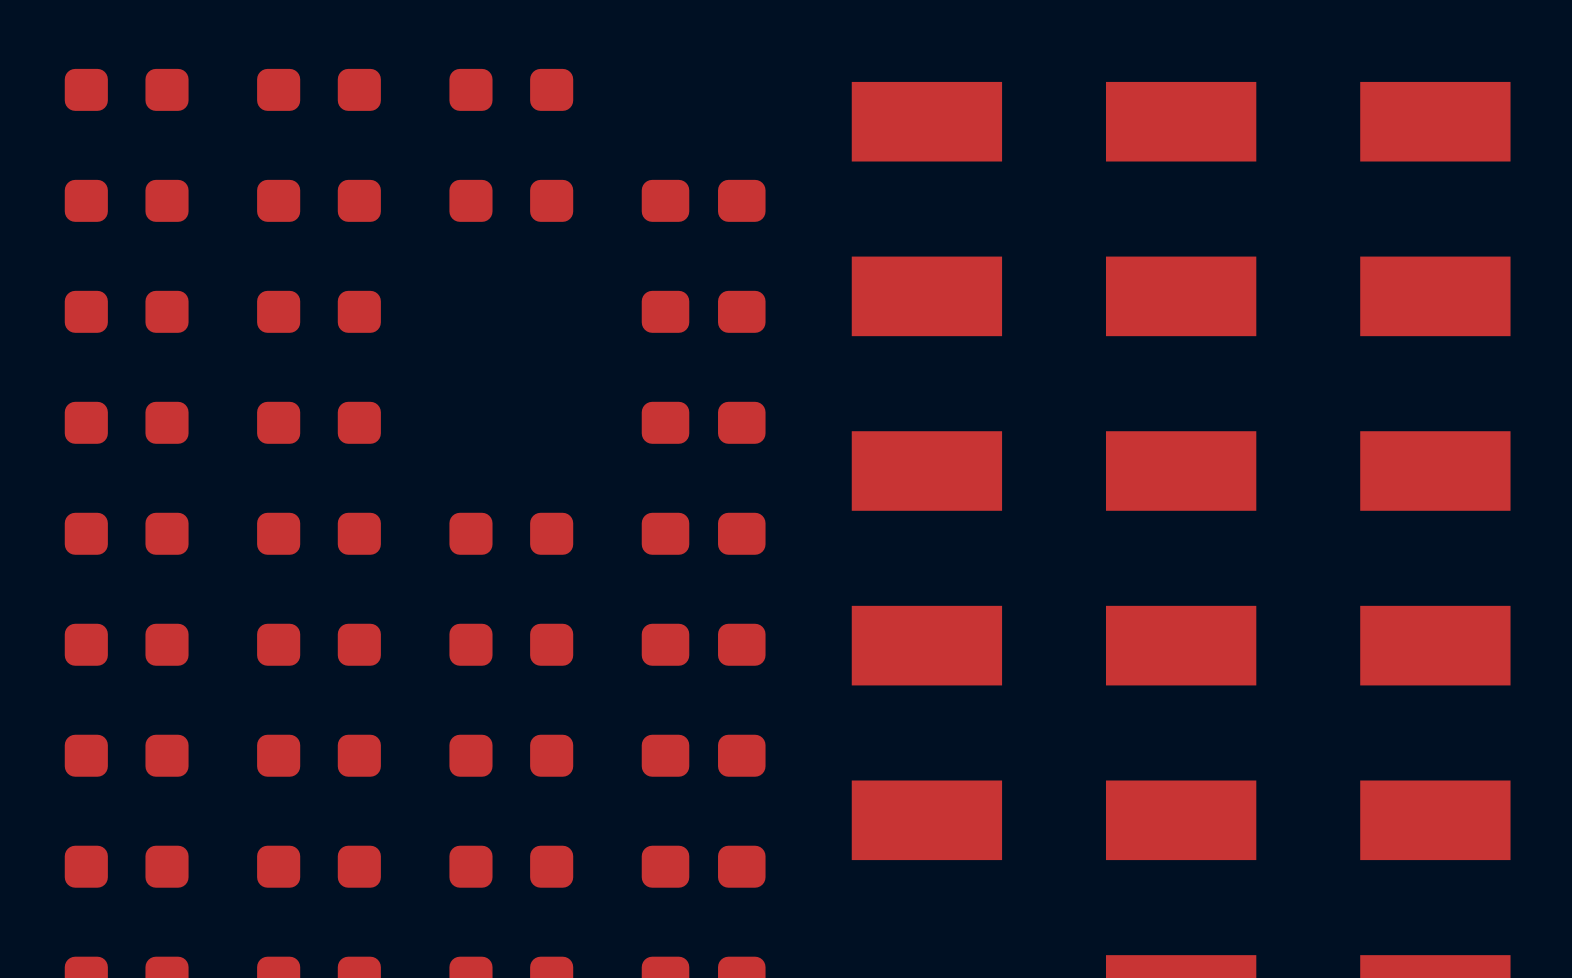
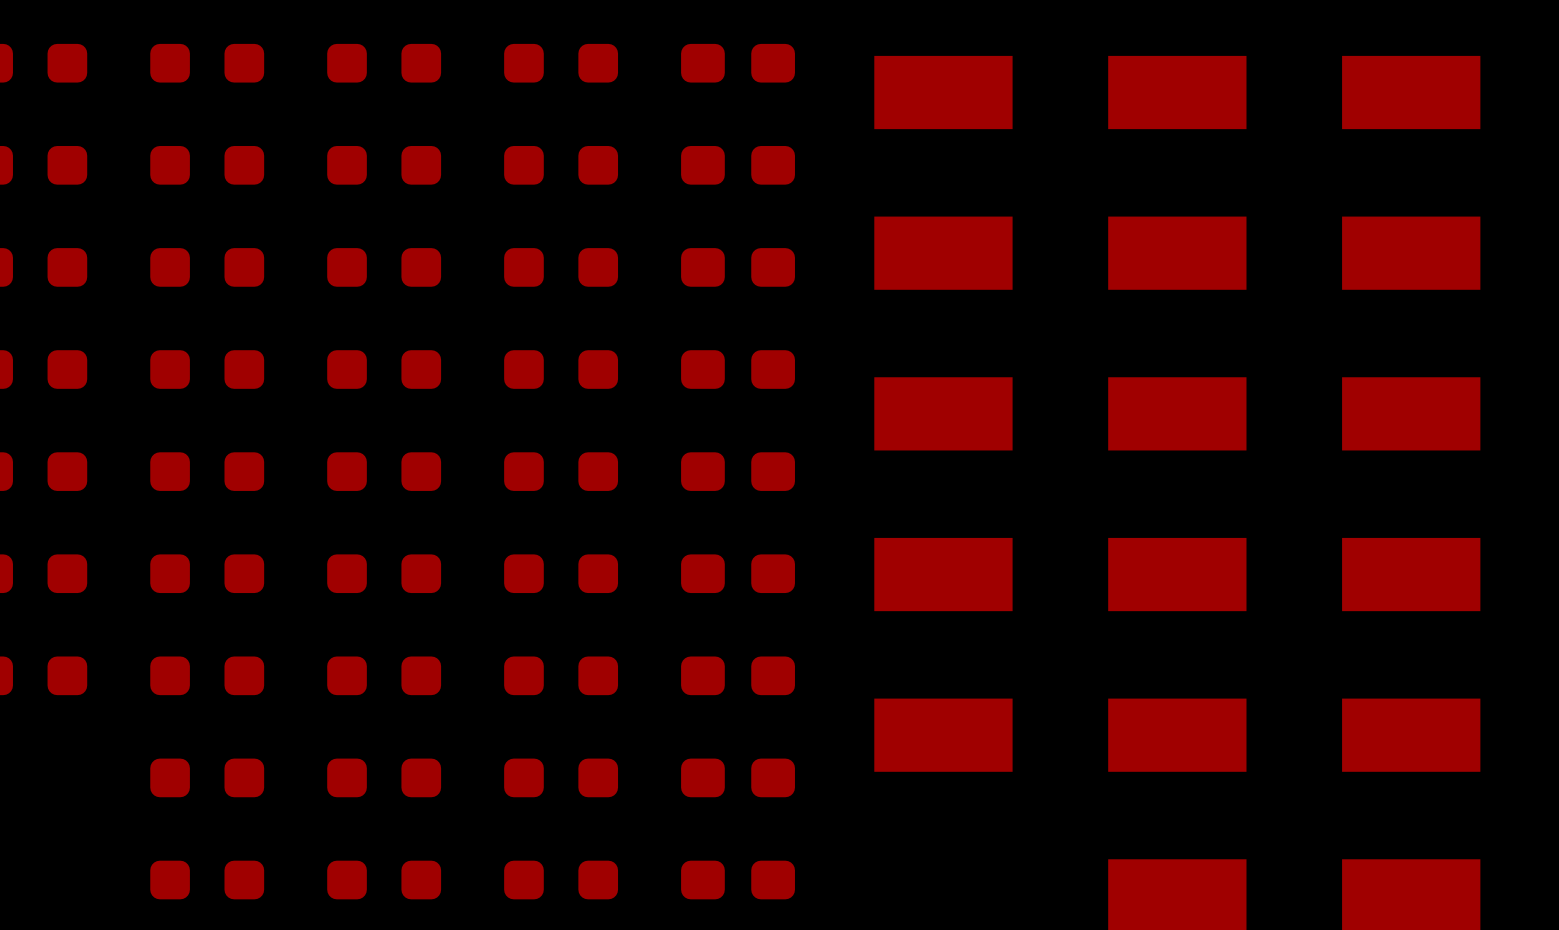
part: none -> (738, 63)
part: none -> (561, 267)
part: none -> (561, 369)

